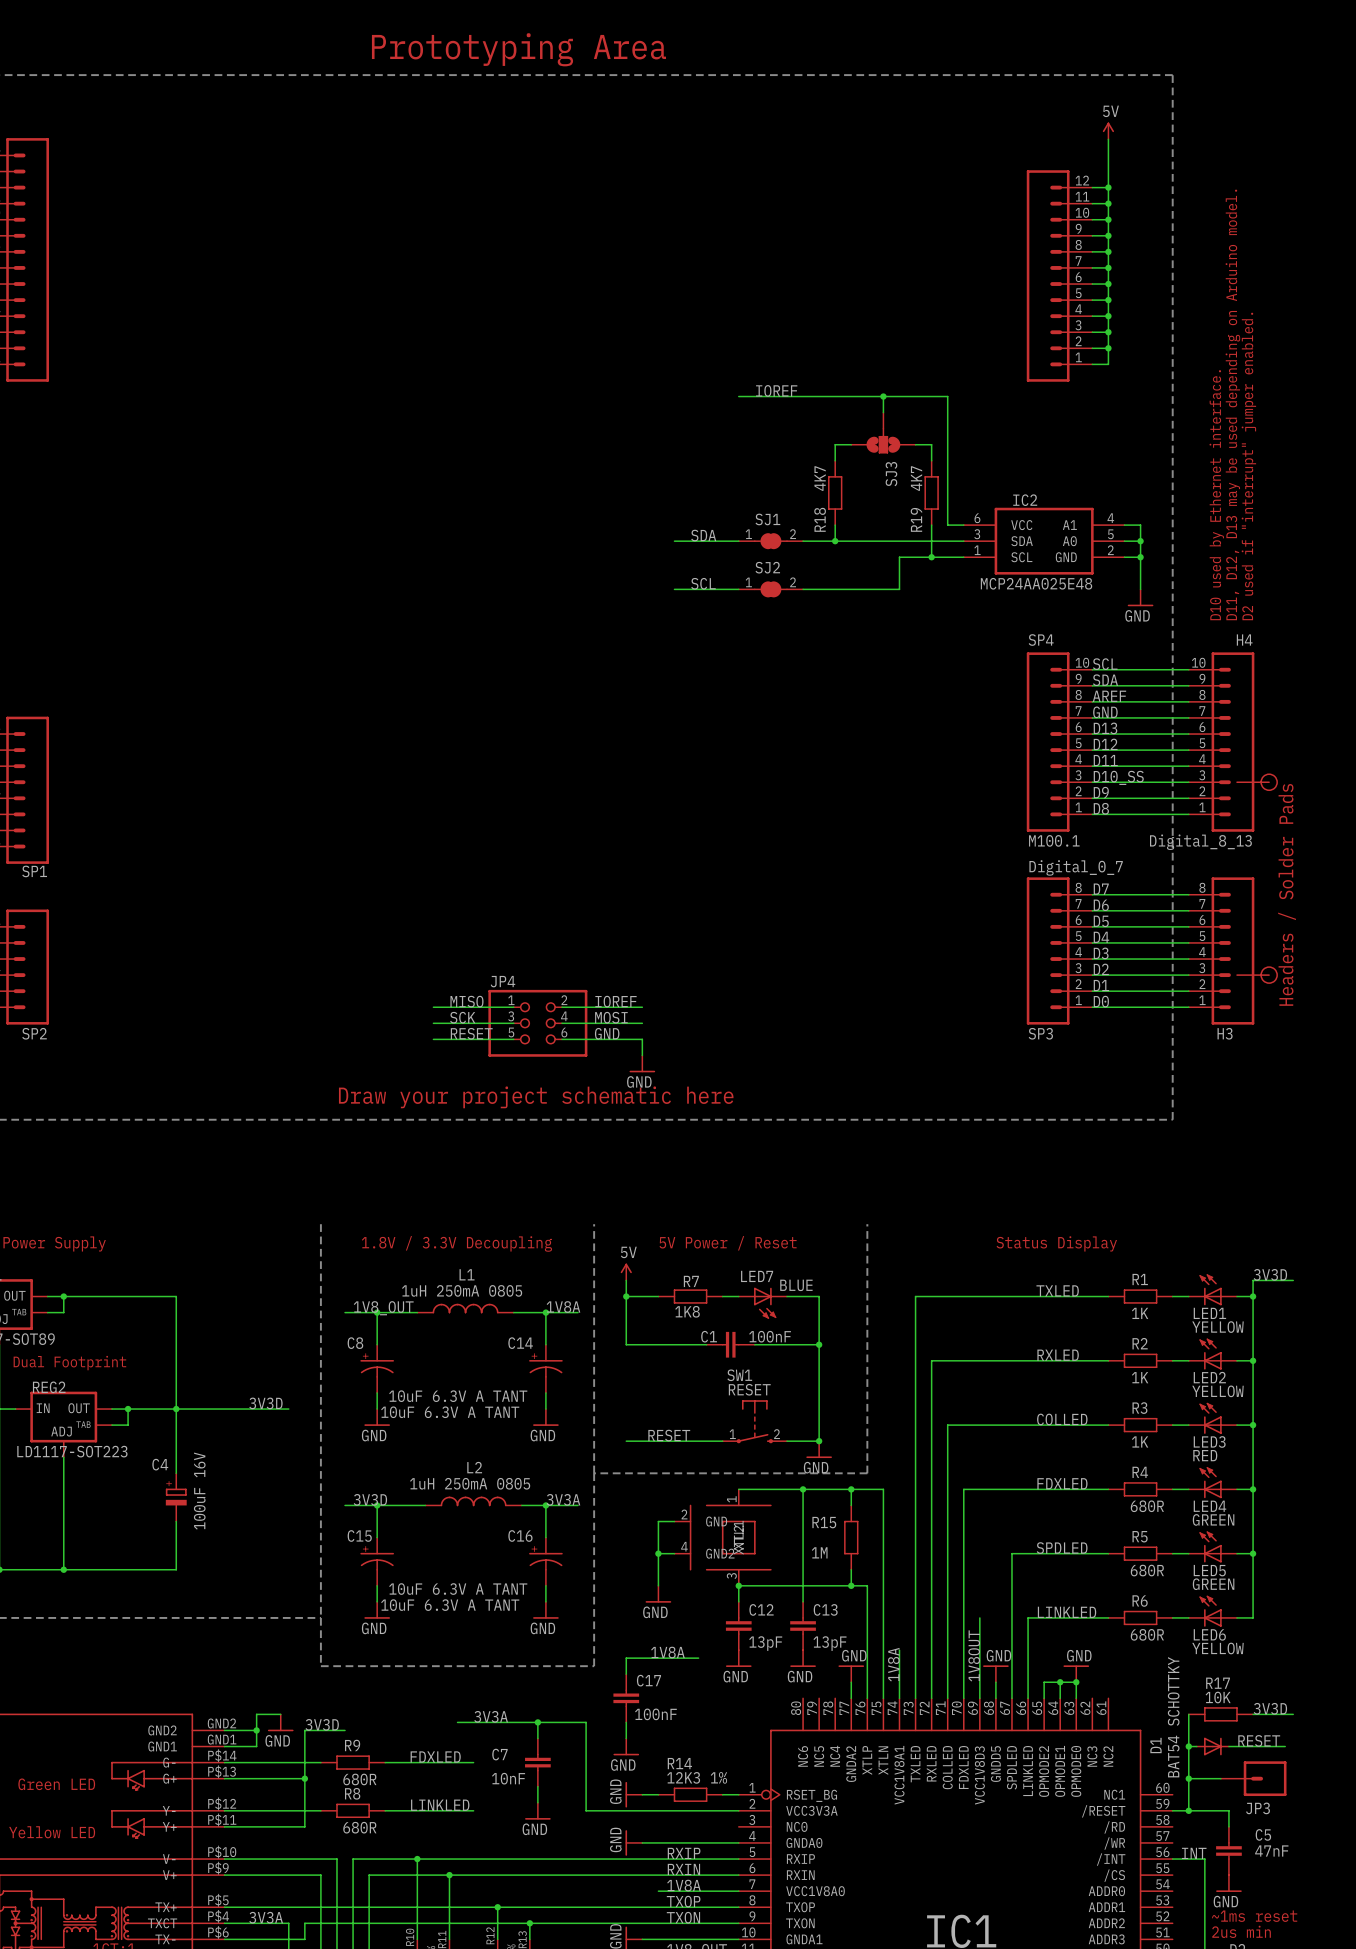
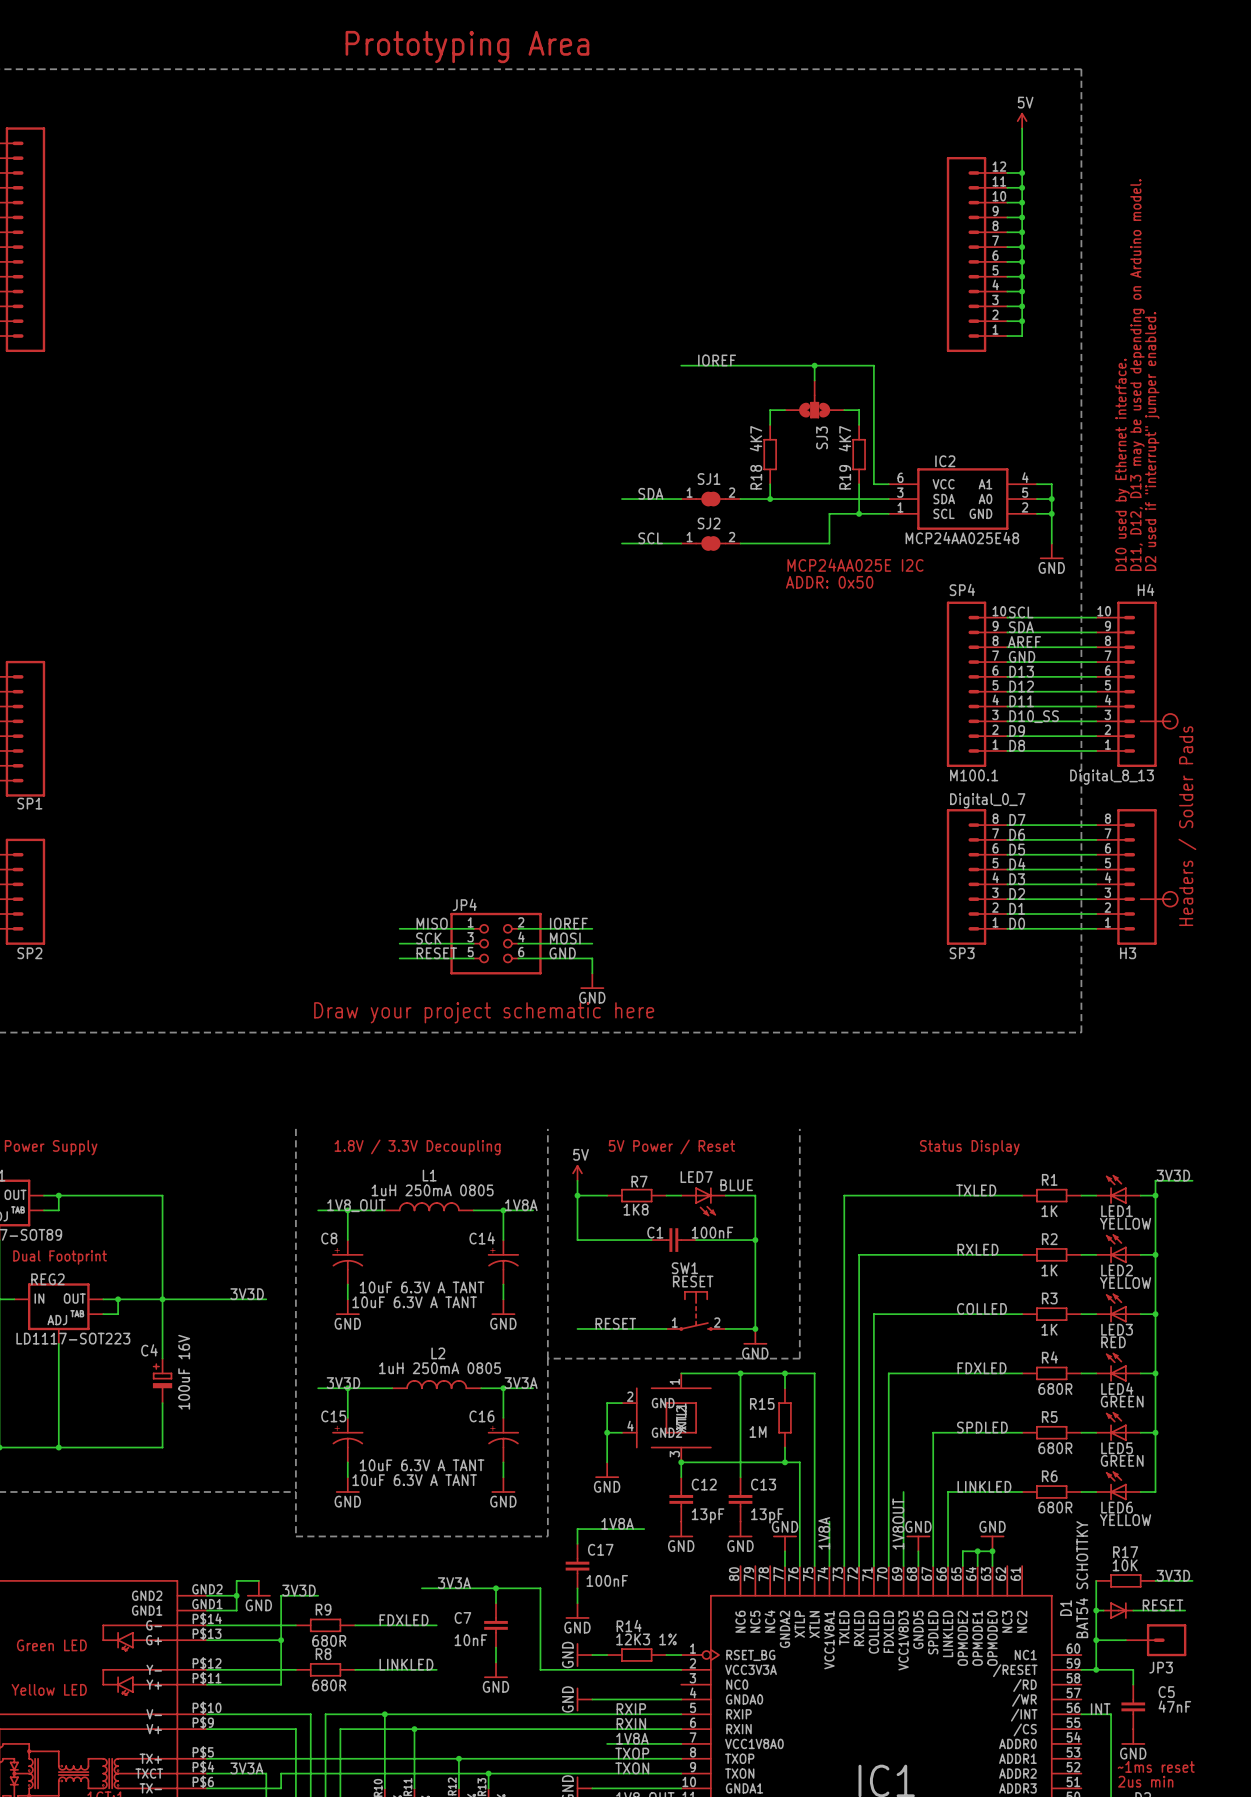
text: none -> MCP24AA025E I2C (855, 565)
text: none -> ADDR: 0x50 (829, 582)

